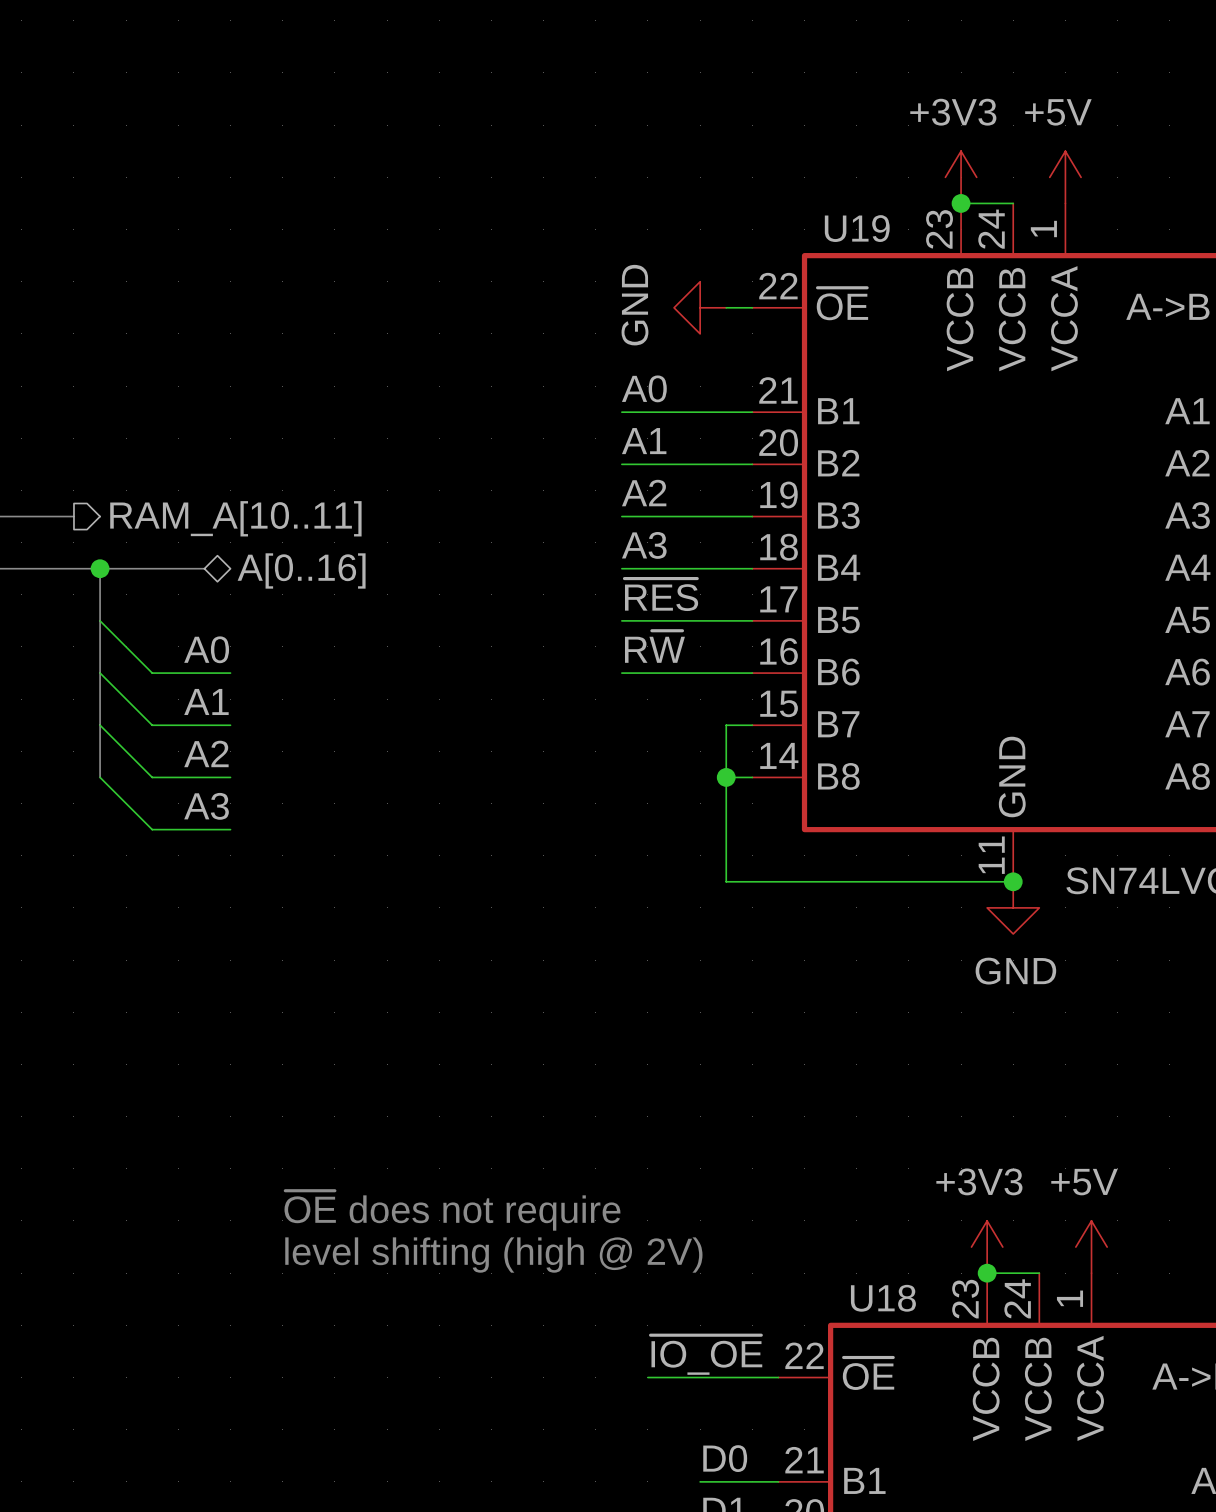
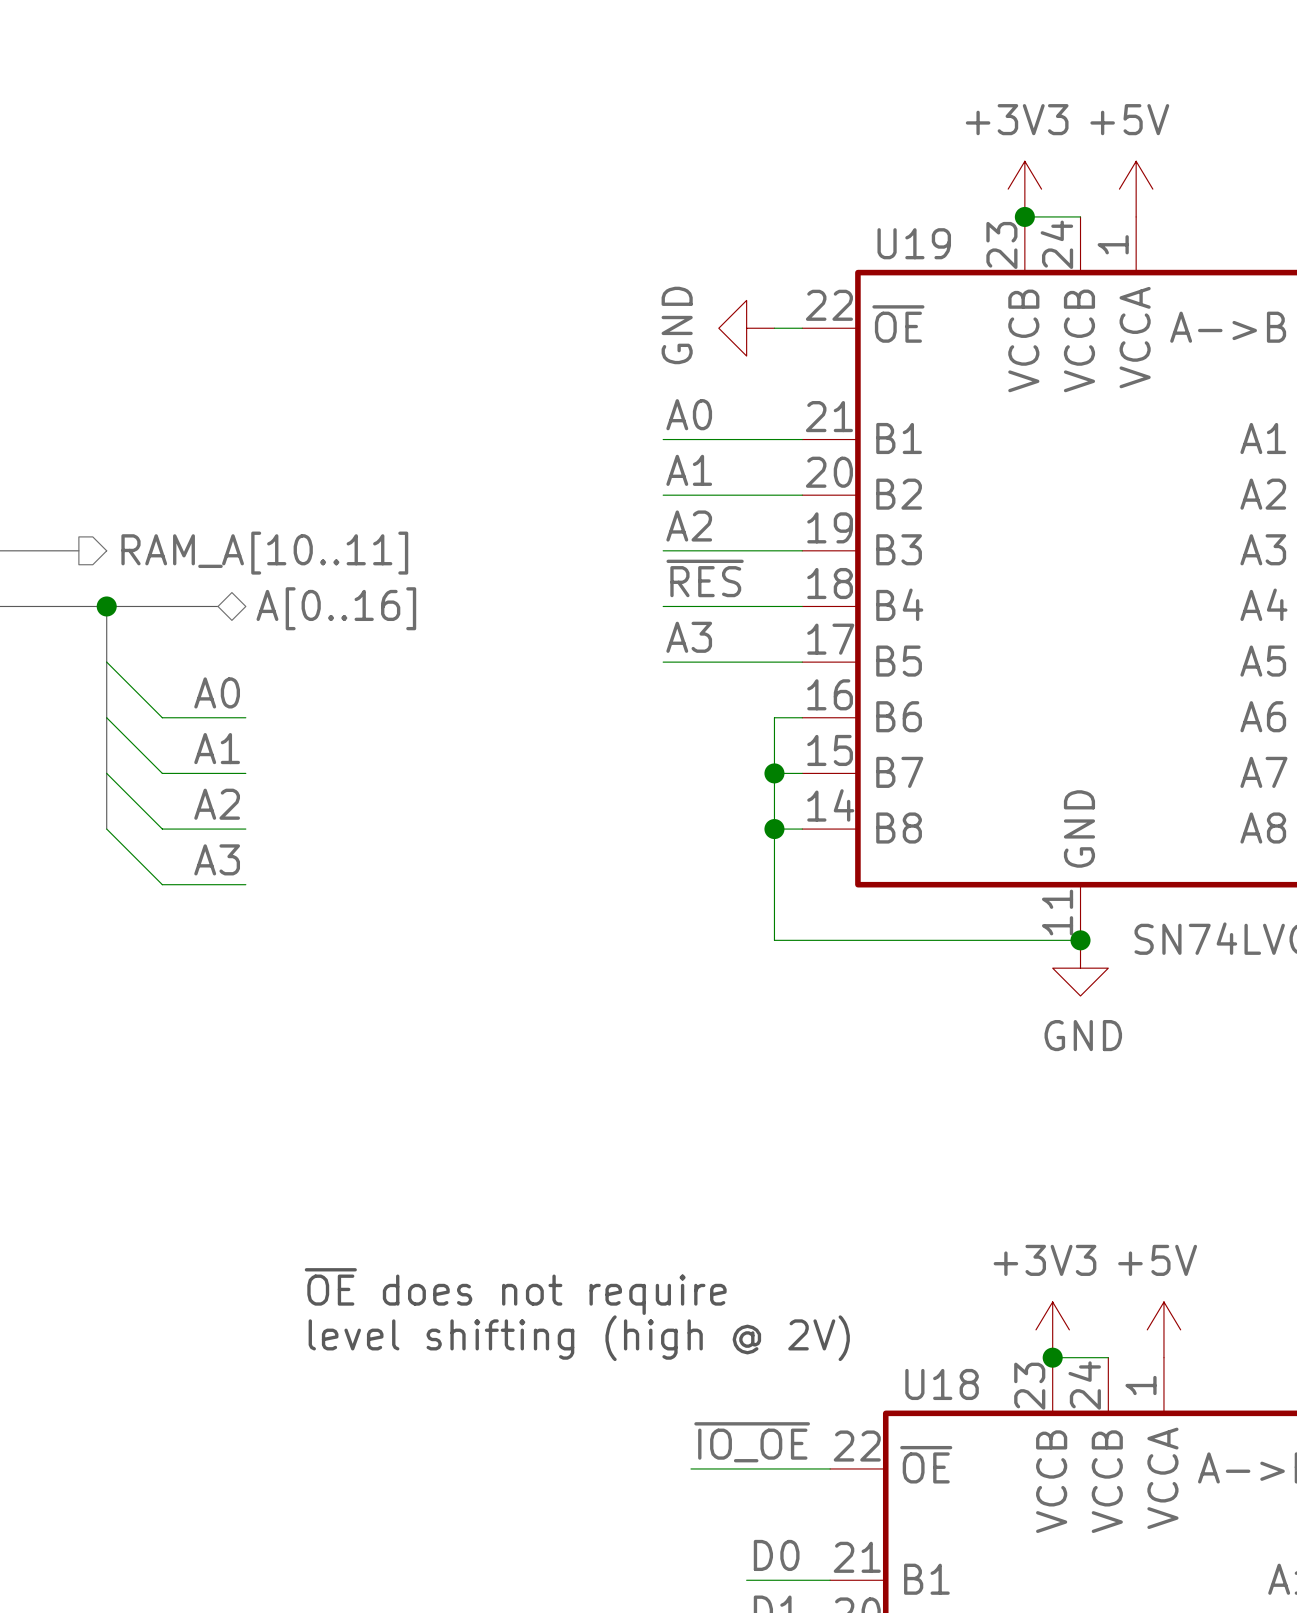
label: A3 (644, 545) -> ~{RES} (705, 578)
label: ~{RES} (661, 594) -> A3 (689, 637)
label: R~{W} (654, 646) -> none
wire: (621, 673) (726, 673) -> (774, 773) (774, 717)
junction: none -> (774, 773)

